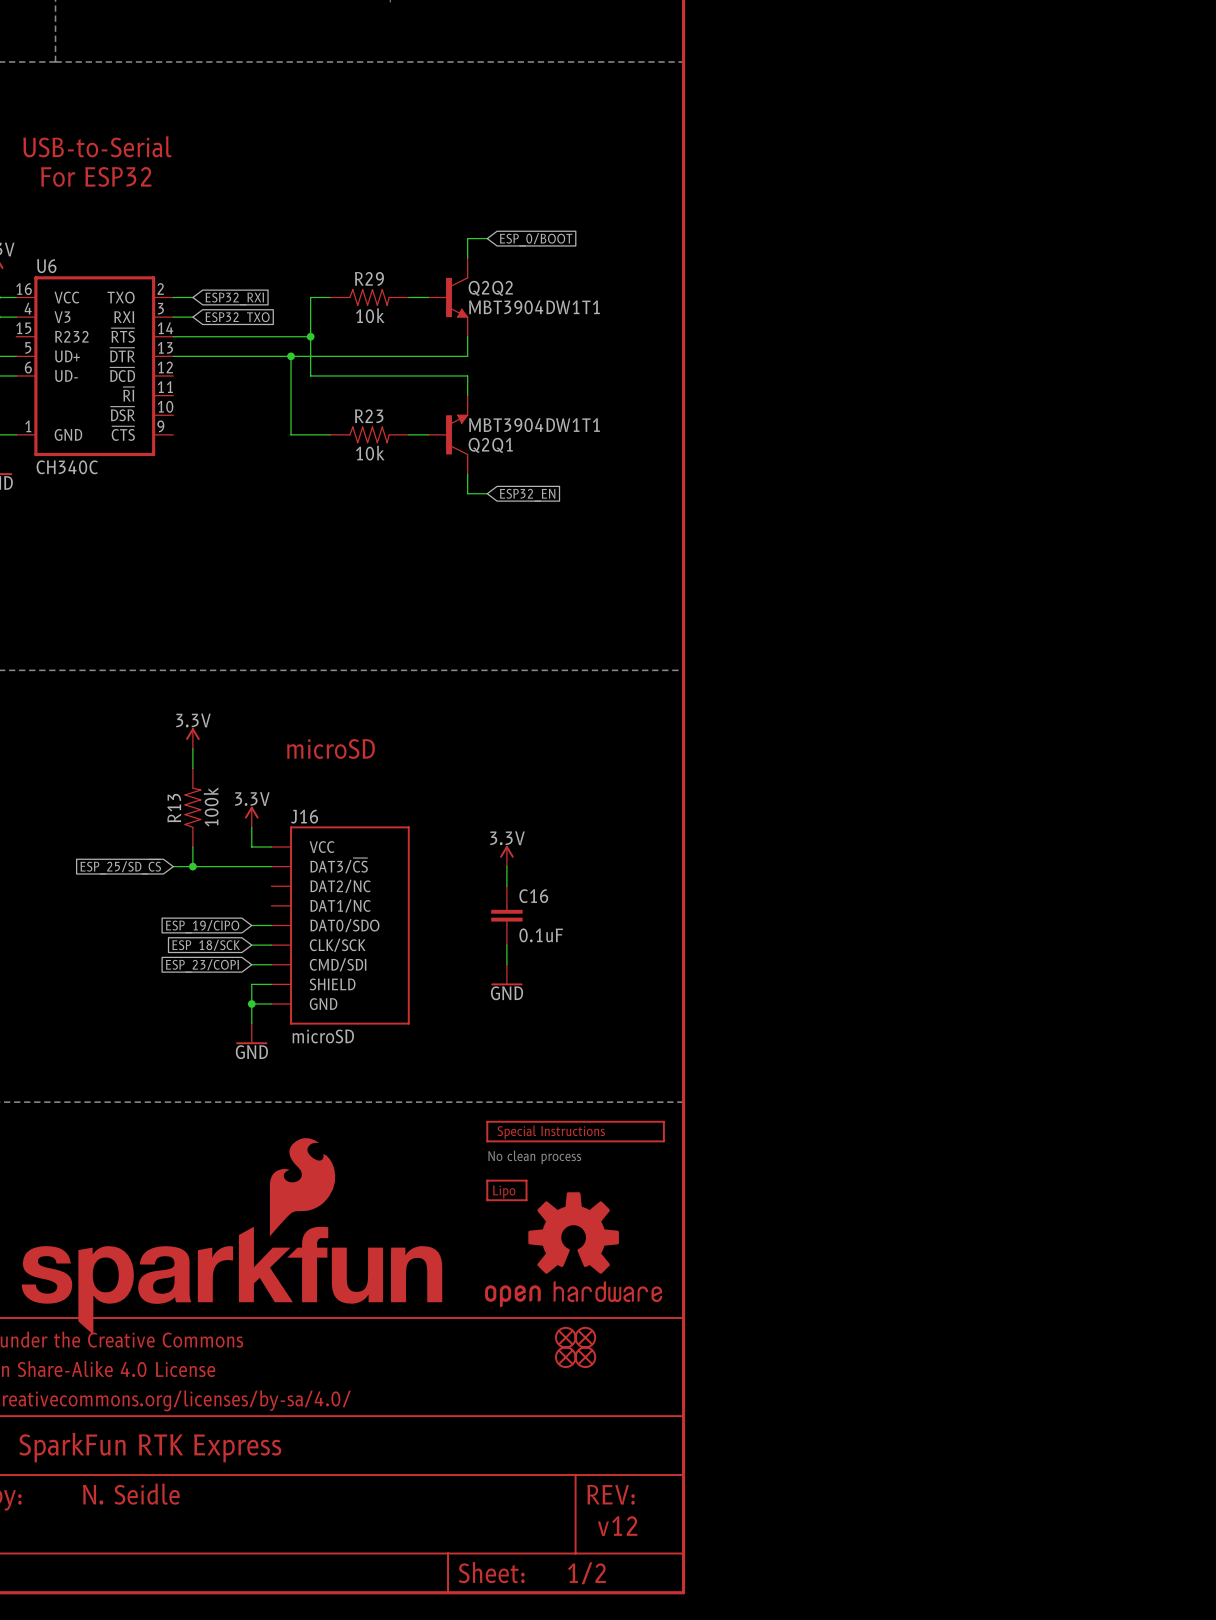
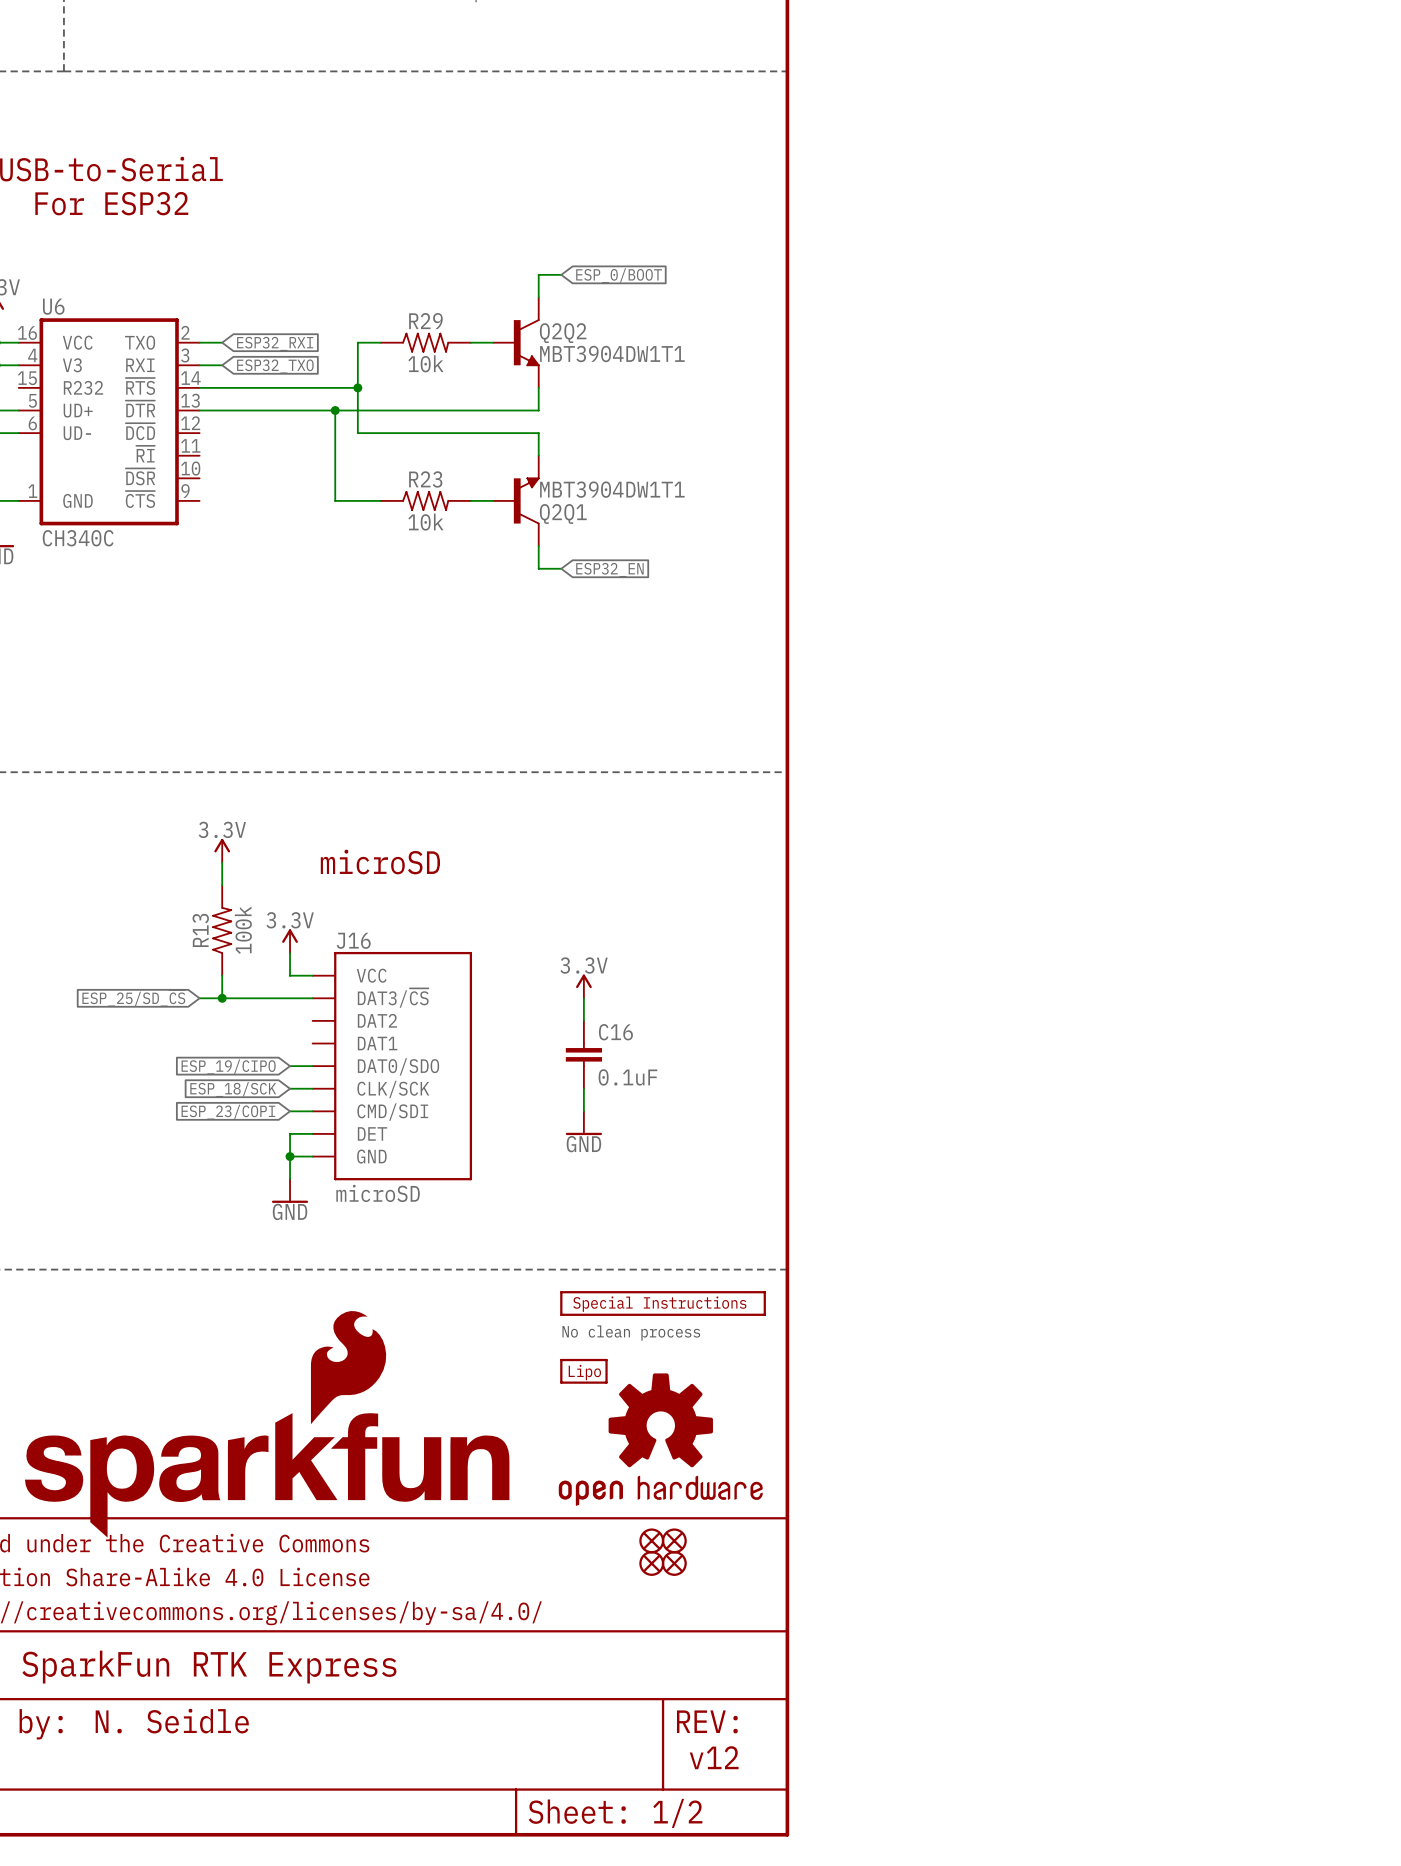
J16 pin name: DAT2/NC (340, 886) -> DAT2 (377, 1020)
J16 pin name: DAT1/NC (340, 905) -> DAT1 (377, 1043)
J16 pin name: SHIELD (332, 984) -> DET (372, 1133)

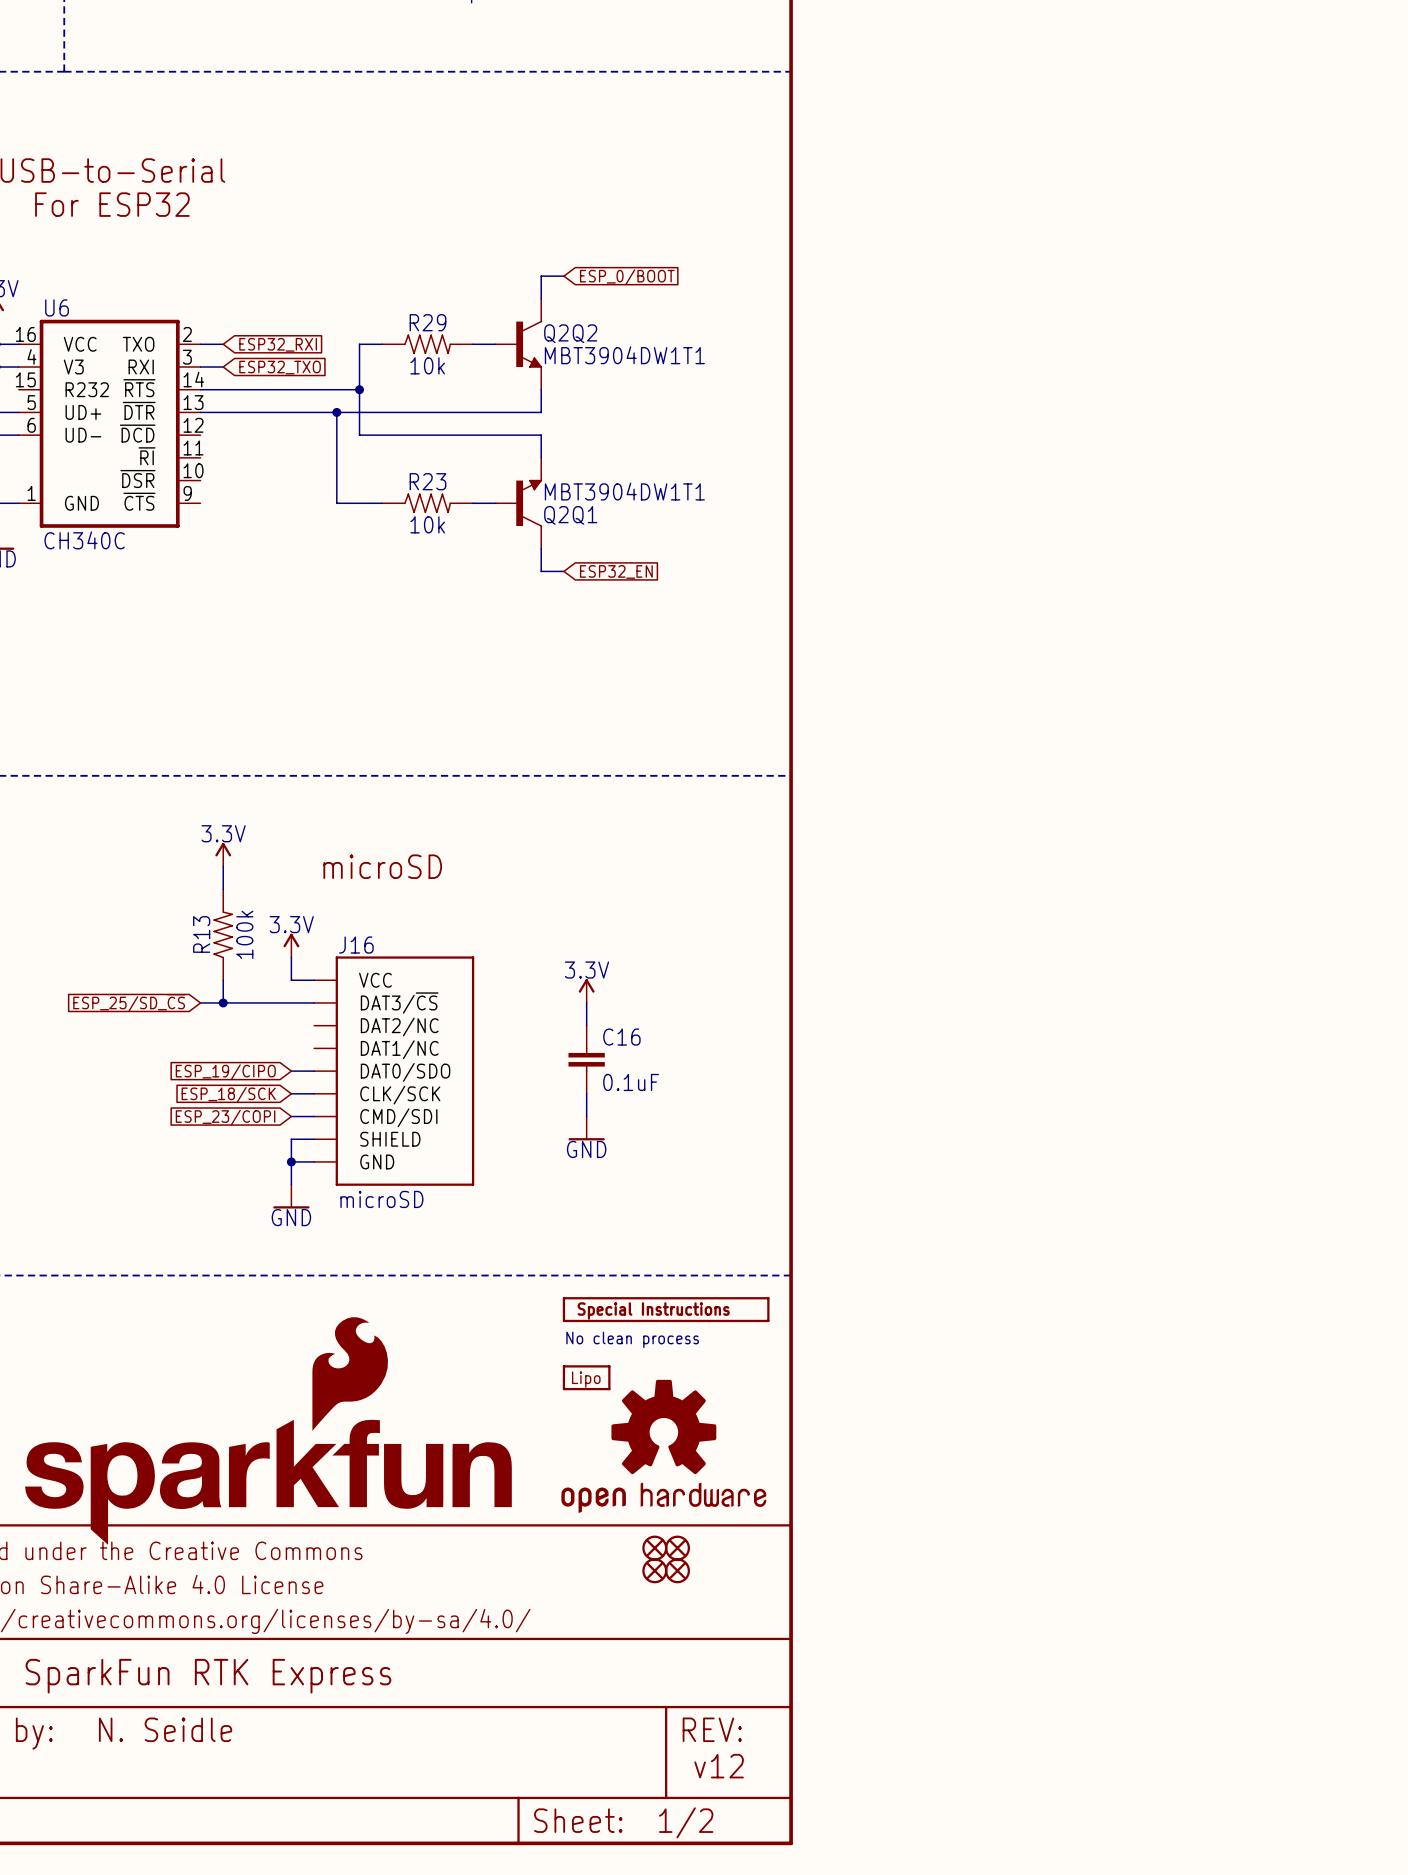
J16 pin name: DAT2 (377, 1020) -> DAT2/NC (399, 1026)
J16 pin name: DAT1 (377, 1043) -> DAT1/NC (399, 1049)
J16 pin name: DET (372, 1133) -> SHIELD (390, 1139)

